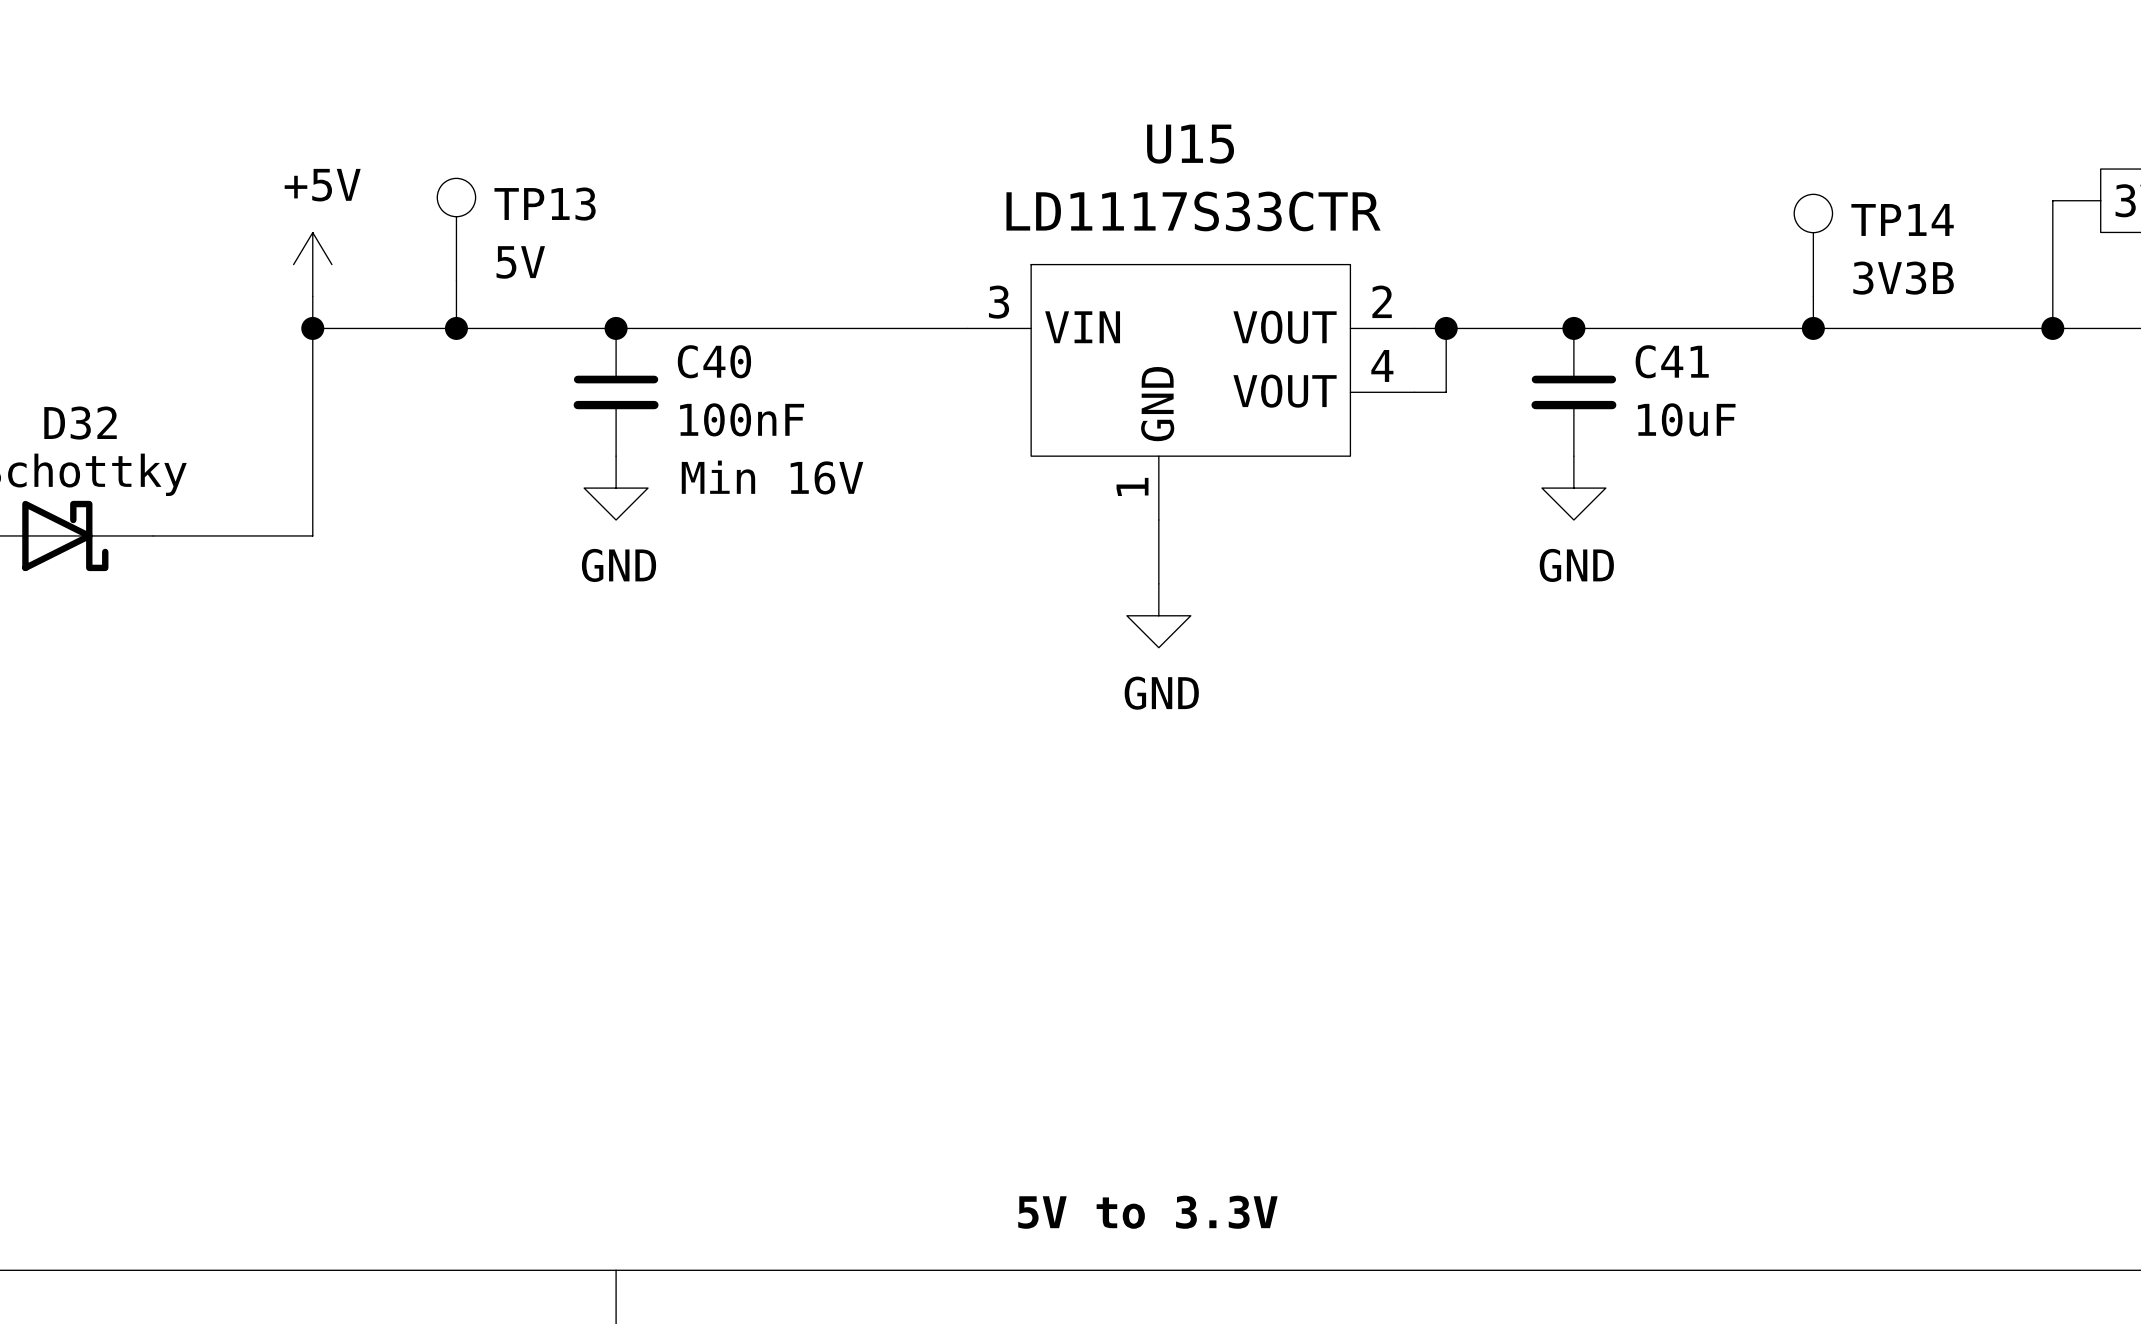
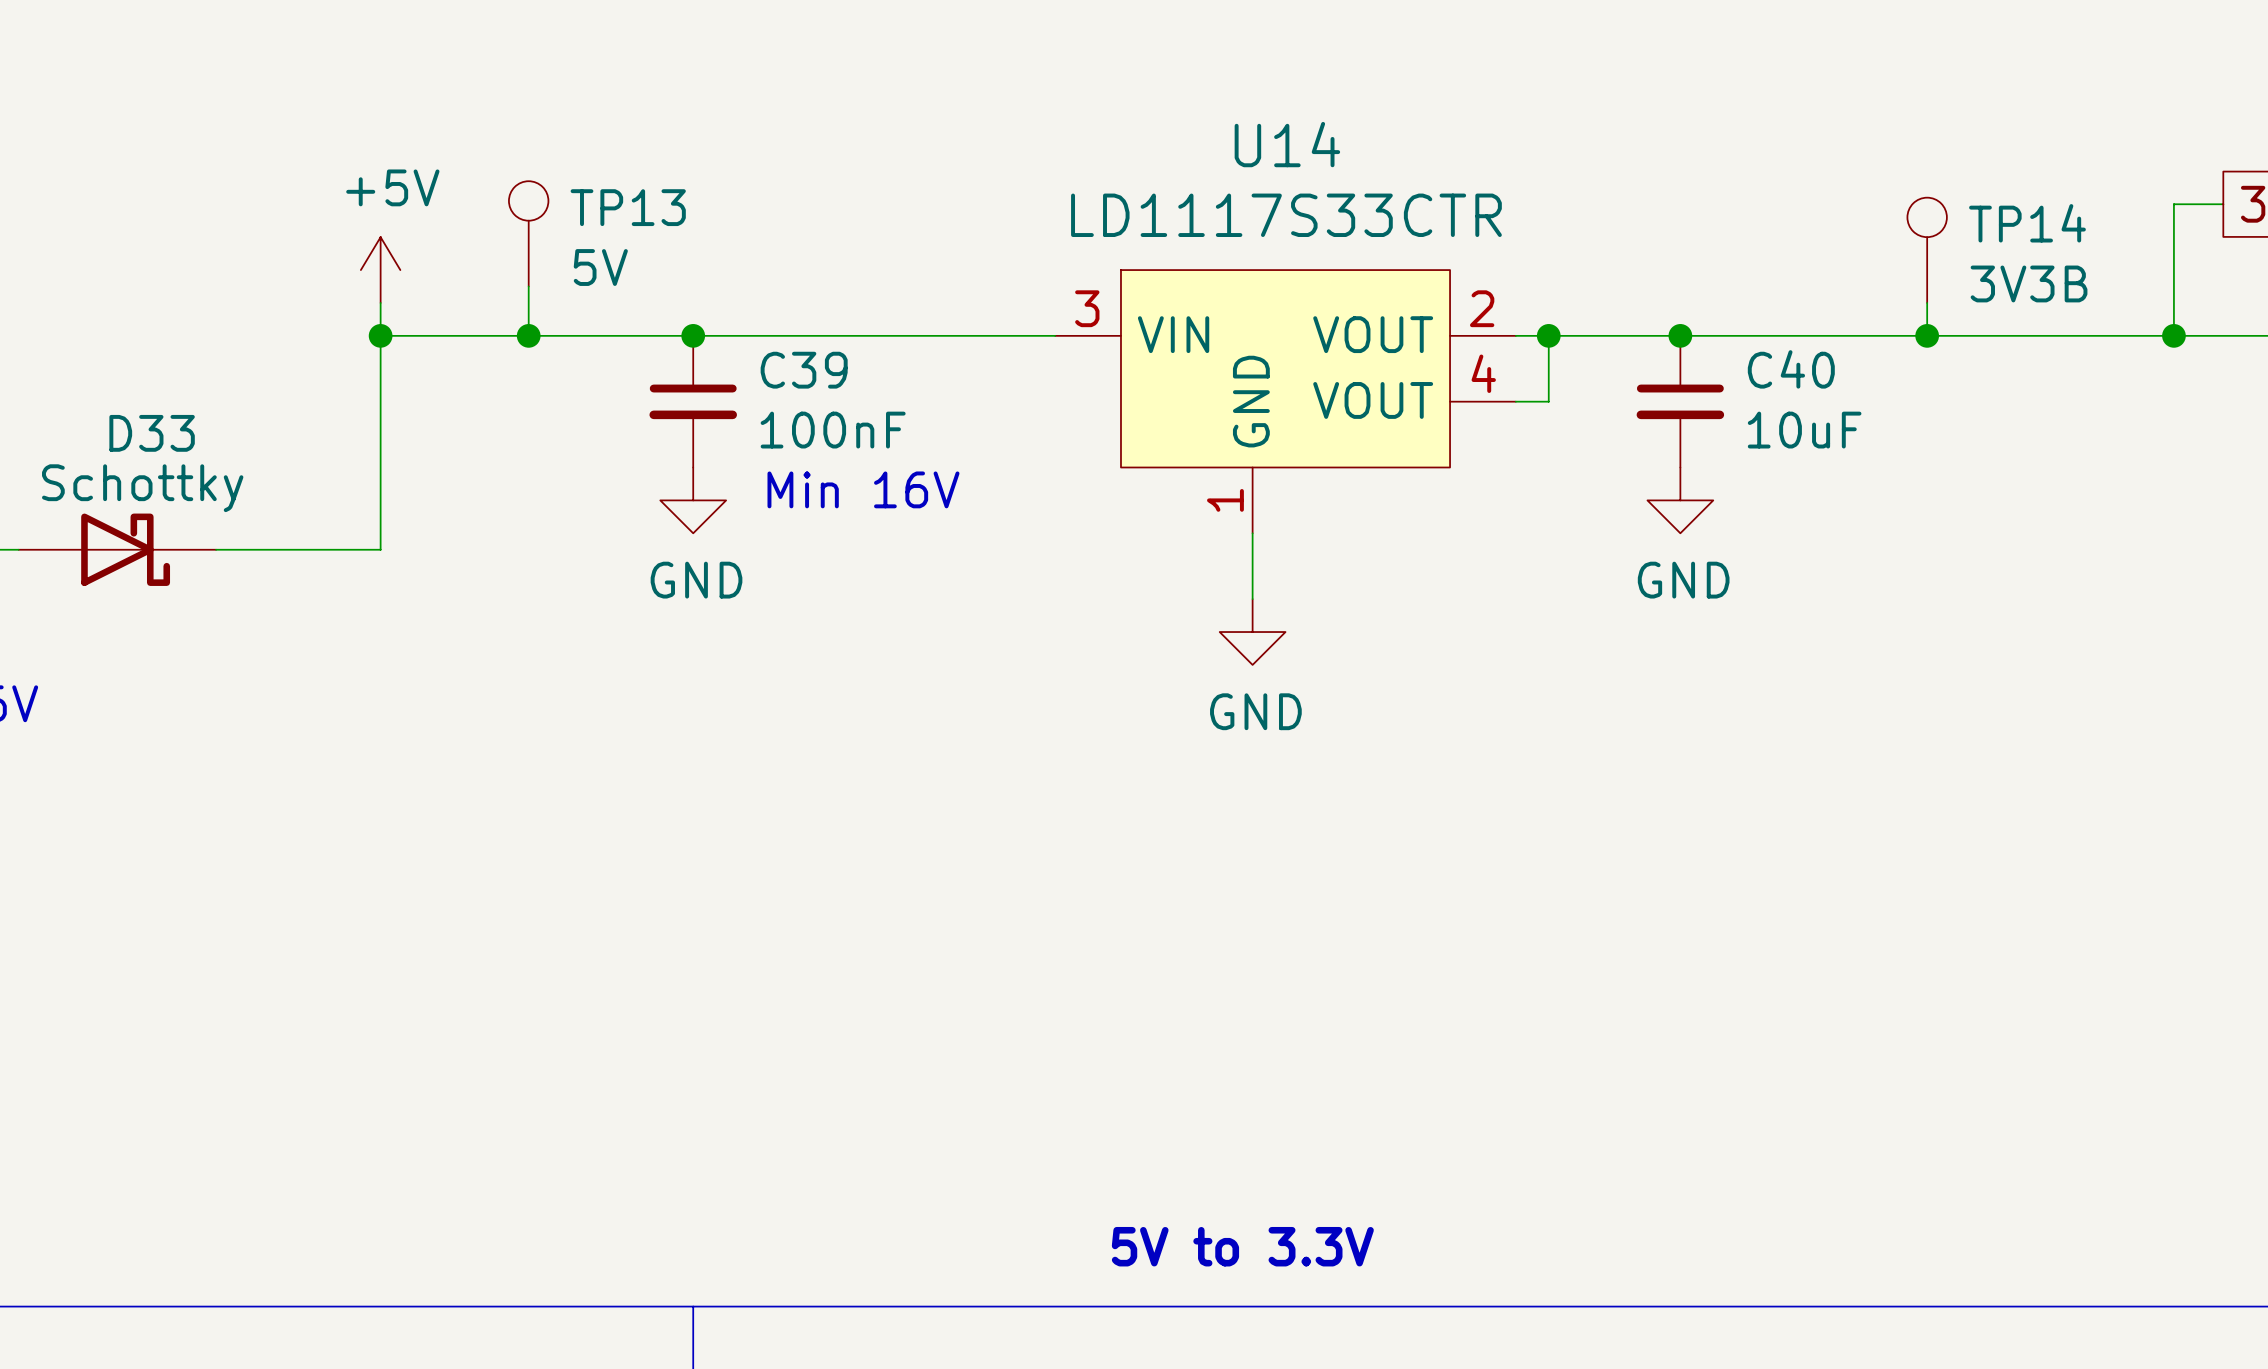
U15 name: U15 (1190, 144) -> U14 (1287, 144)
C40 name: C40 (714, 361) -> C39 (804, 370)
C41 name: C41 (1672, 361) -> C40 (1791, 369)
D32 name: D32 (80, 423) -> D33 (152, 433)

